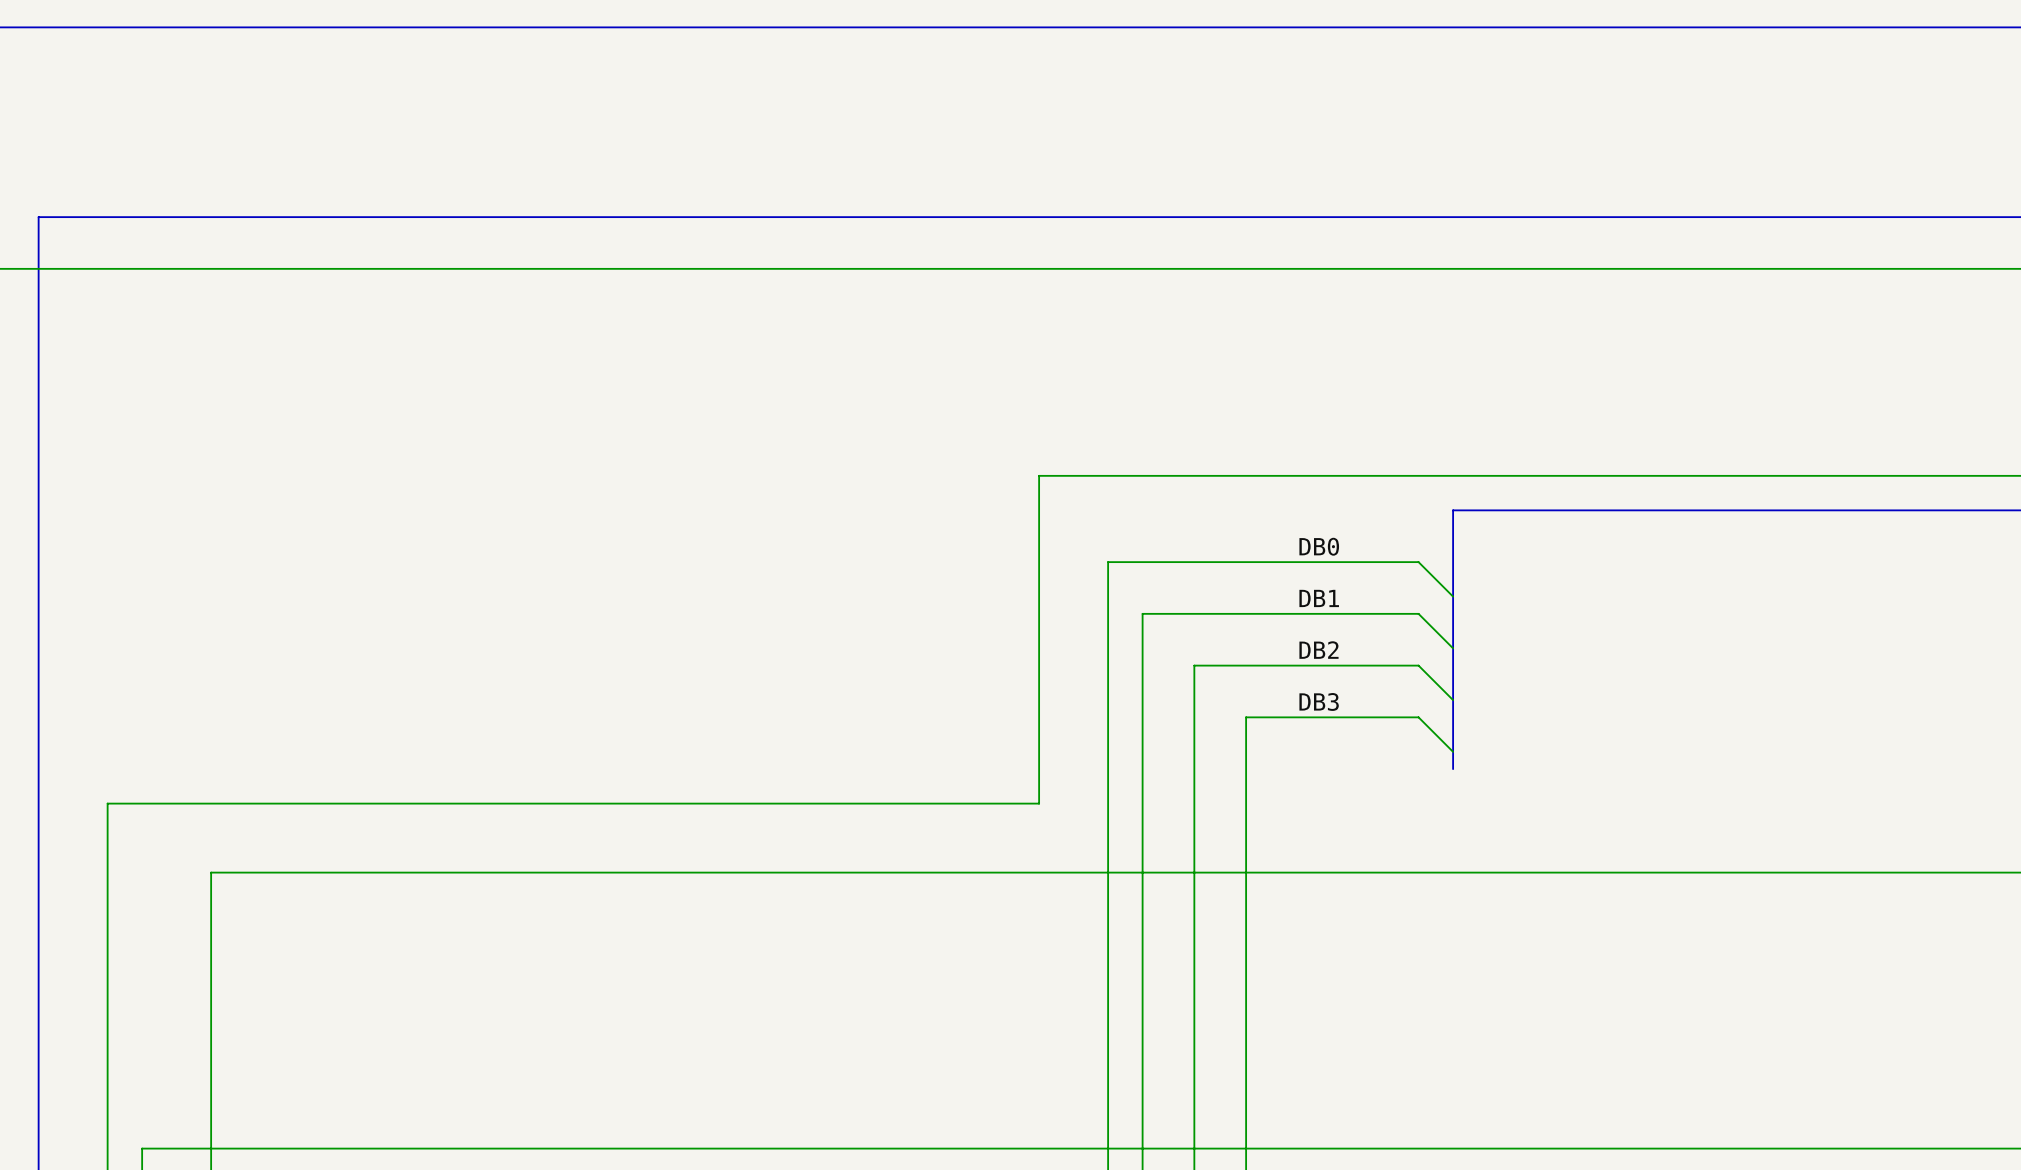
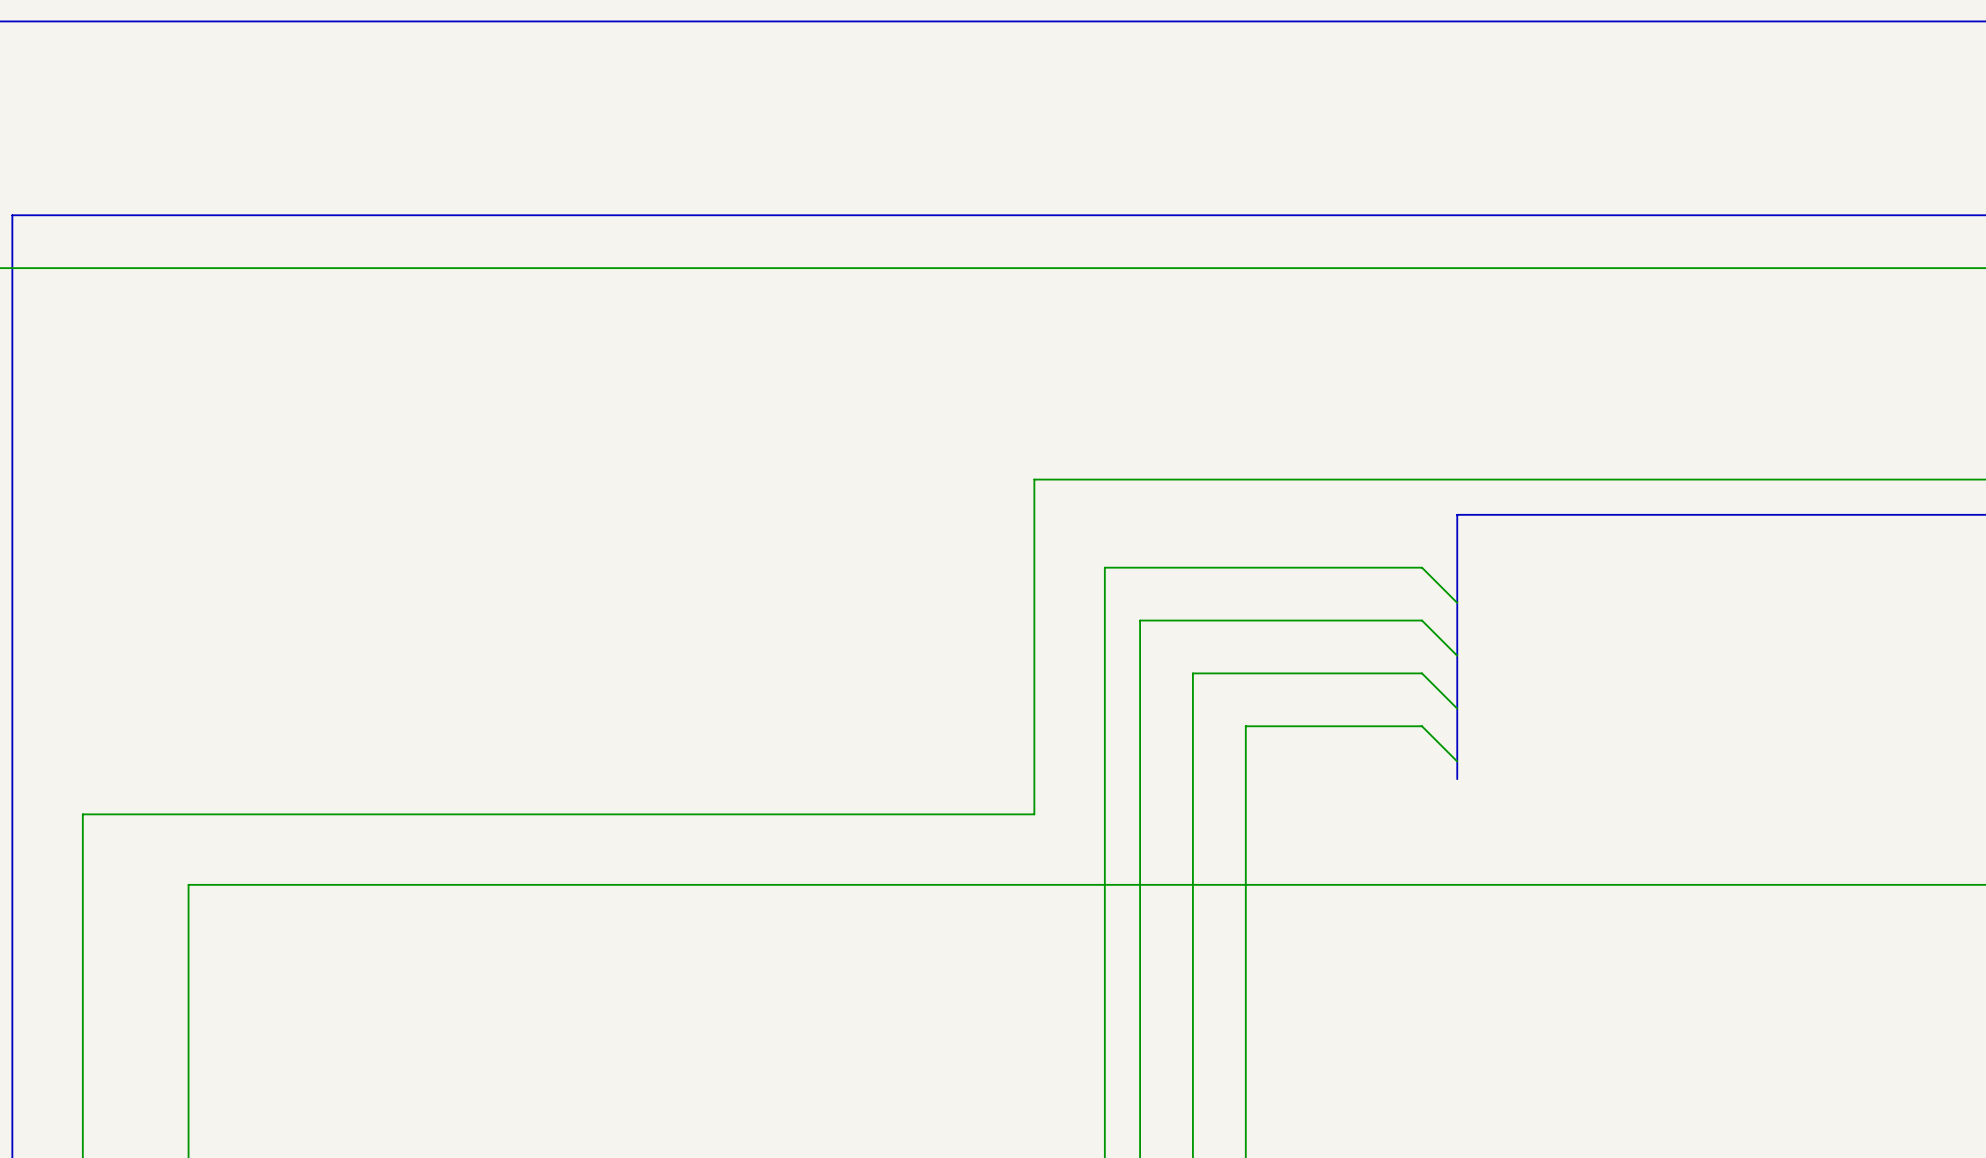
label: DB0 (1319, 546) -> none
label: DB1 (1319, 598) -> none
label: DB2 (1318, 650) -> none
label: DB3 (1319, 701) -> none

